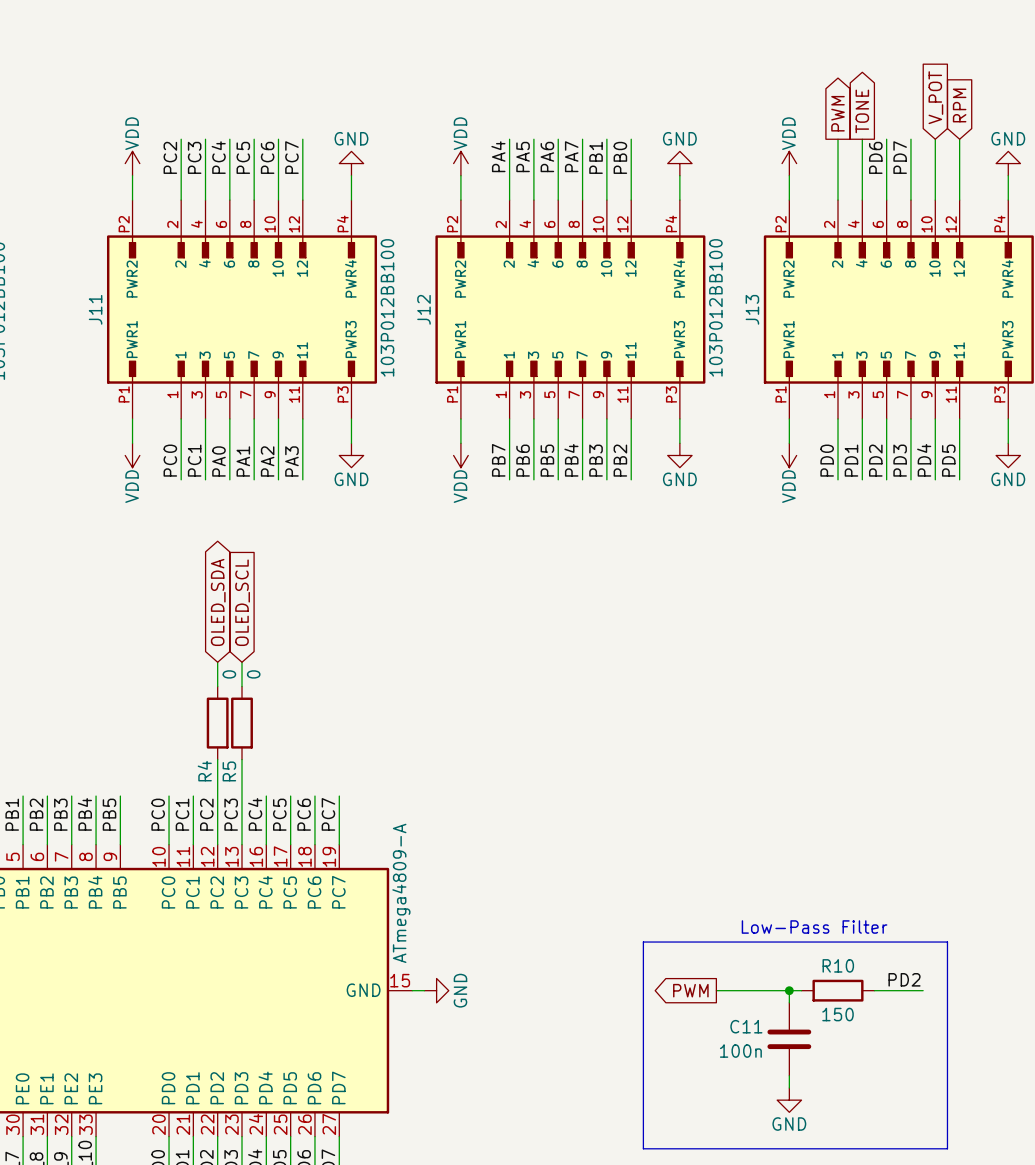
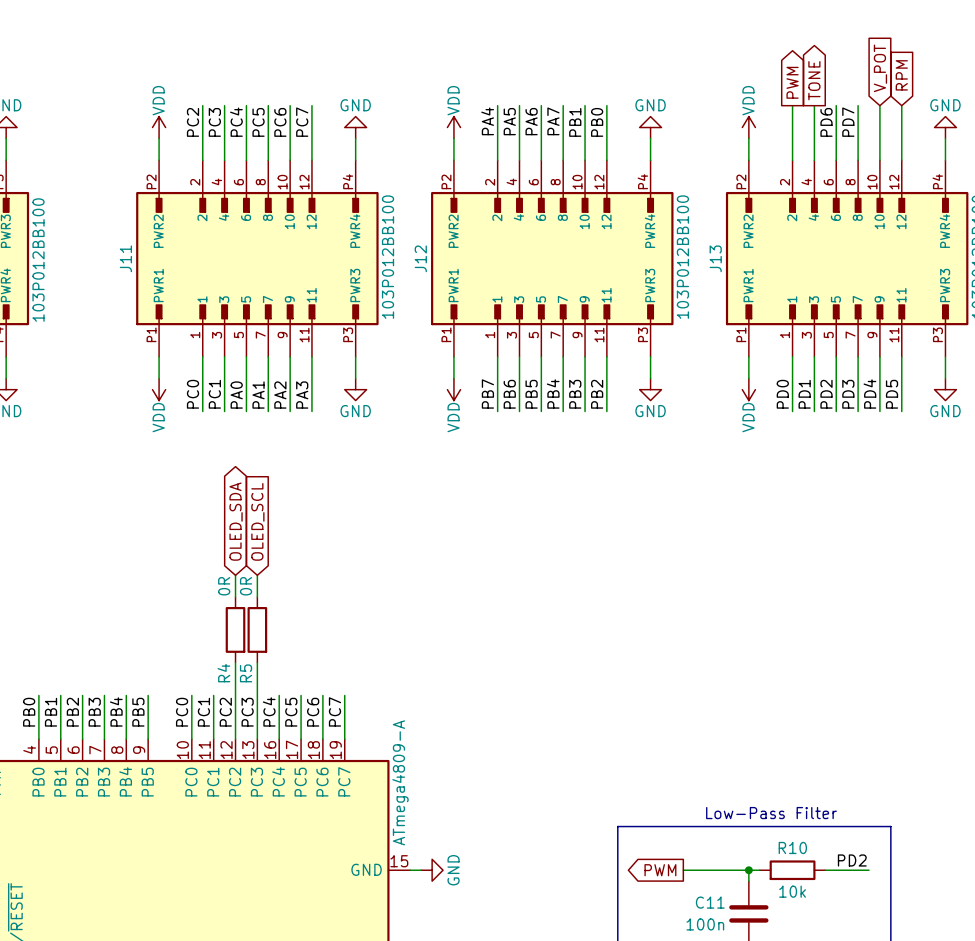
R4 value: 0 (229, 674) -> 0R (224, 586)
R5 value: 0 (253, 674) -> 0R (246, 586)
R10 value: 150 (838, 1014) -> 10k (792, 891)

